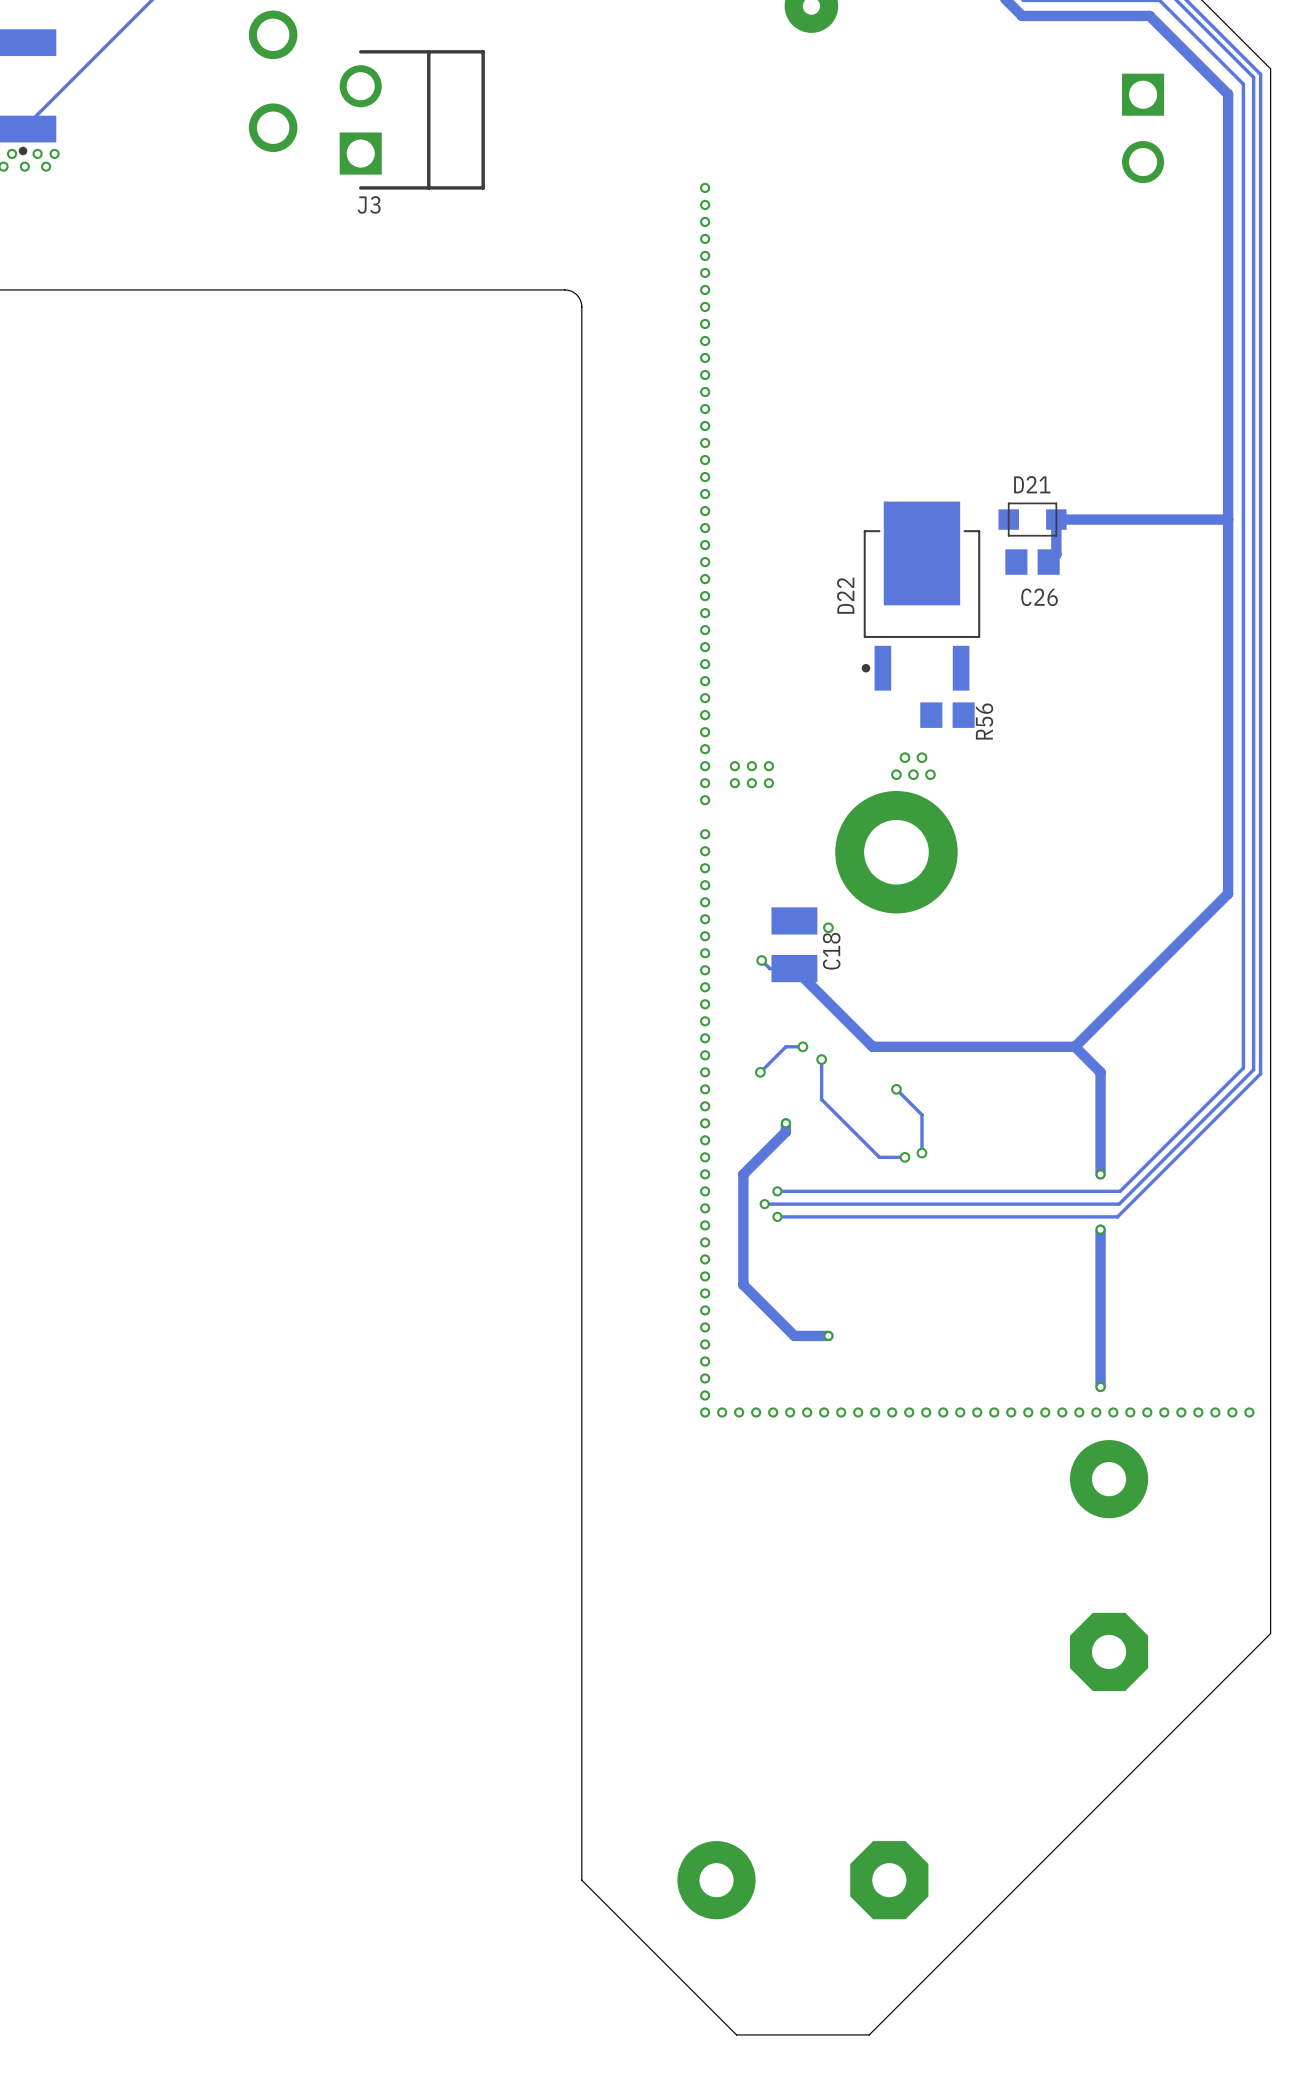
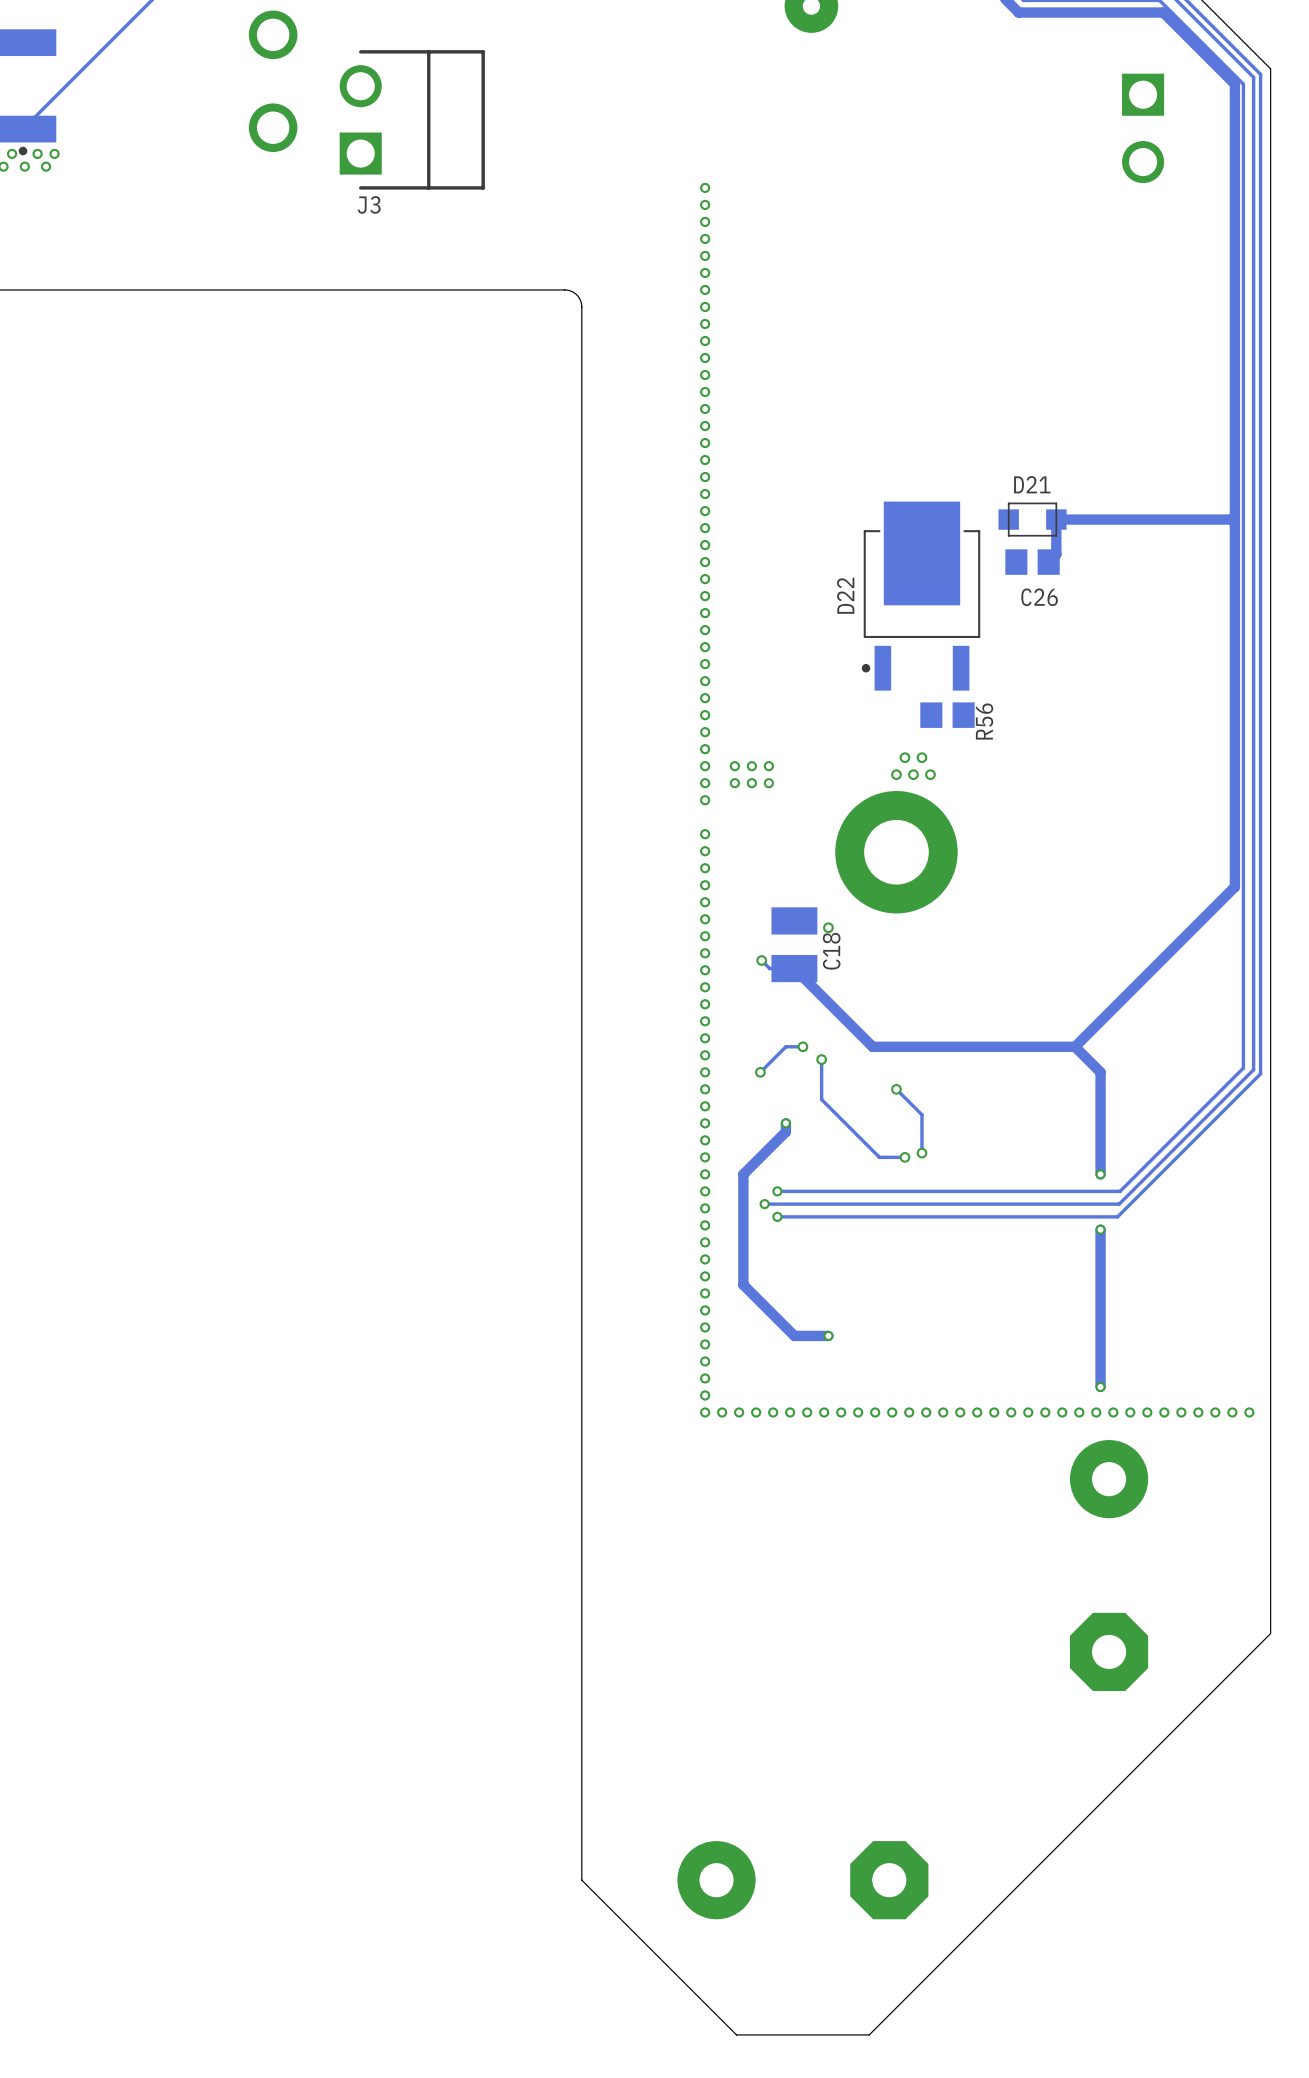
track: (1018, 12) (1022, 15) (1149, 15) (1228, 94) (1228, 893) -> (1018, 12) (1163, 12) (1234, 84) (1234, 886) (1228, 893)

